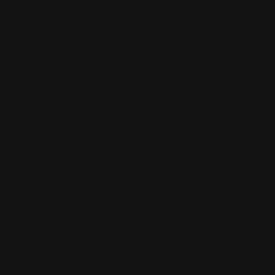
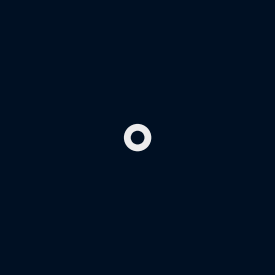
via: none -> (137, 137)

